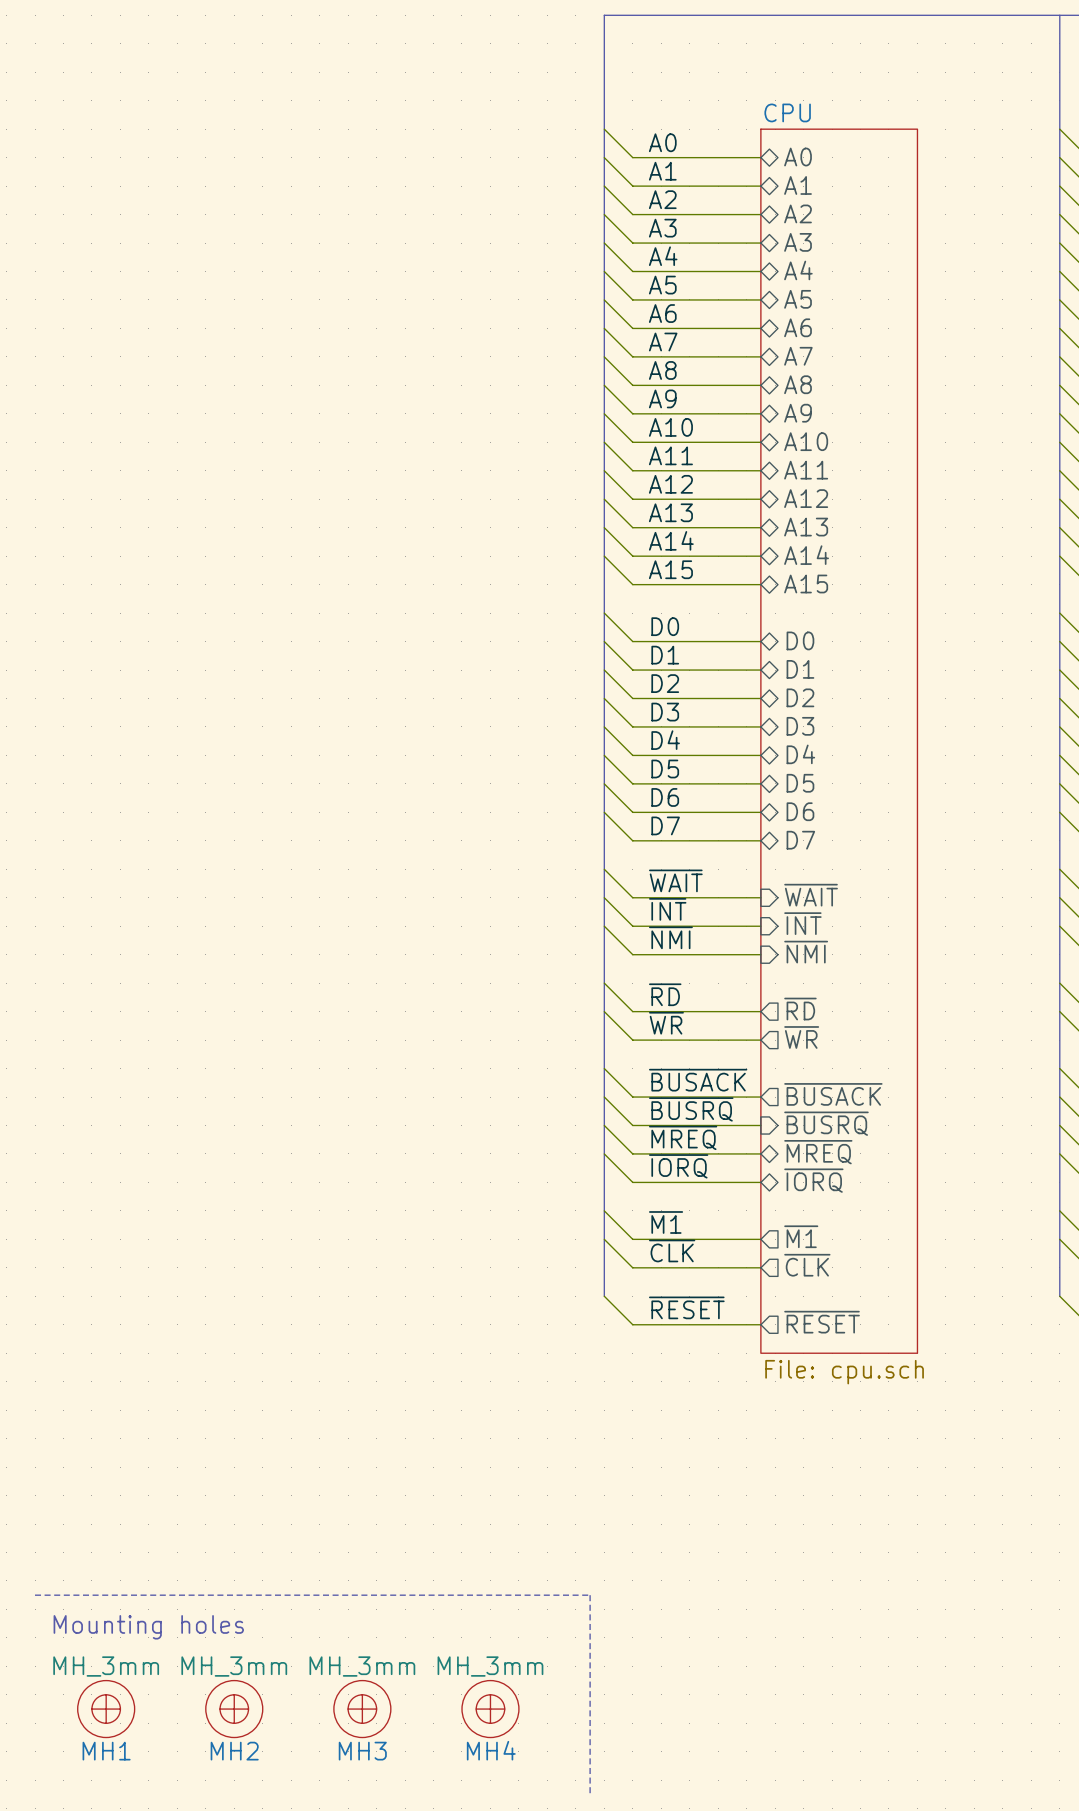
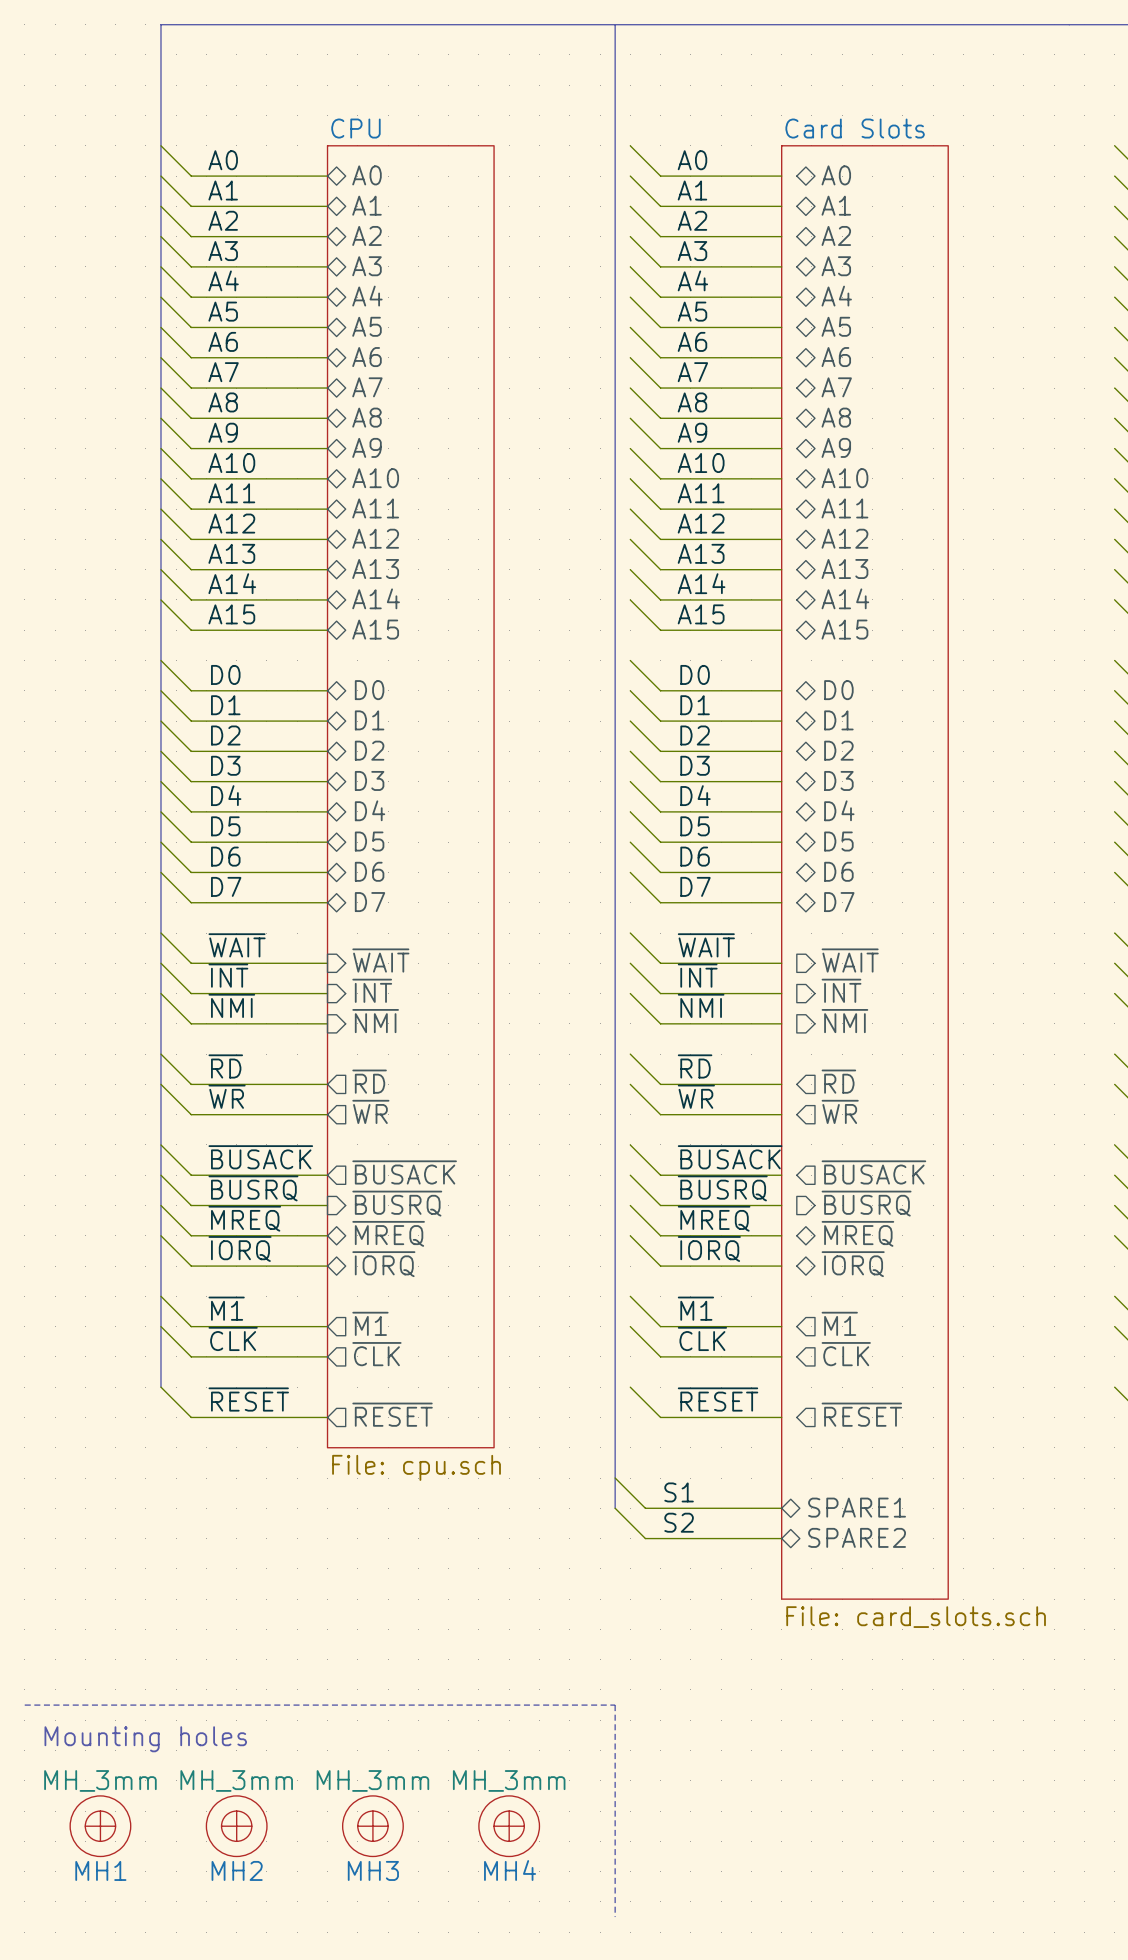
bus: none -> (615, 24) (615, 1508)
bus: (604, 15) (604, 1296) -> (630, 24) (160, 24) (160, 1387)
bus: (1059, 15) (1059, 1296) -> none
wire: none -> (160, 145) (191, 176) (327, 176)
label: none -> A0 (223, 160)
wire: none -> (160, 176) (191, 206) (327, 206)
sheet pin: none -> A0 (366, 175)
wire: (746, 157) (760, 157) -> none
label: none -> A1 (223, 190)
sheet pin: none -> A1 (366, 205)
wire: none -> (160, 206) (191, 236) (327, 236)
wire: (746, 186) (760, 186) -> none
label: none -> A2 (223, 220)
sheet pin: none -> A2 (366, 235)
wire: none -> (160, 236) (191, 266) (327, 266)
wire: (746, 214) (760, 214) -> none
label: none -> A3 (223, 251)
sheet pin: none -> A3 (366, 266)
wire: none -> (160, 266) (191, 297) (327, 297)
wire: (746, 243) (760, 243) -> none
label: none -> A4 (223, 280)
sheet pin: none -> A4 (367, 296)
wire: none -> (160, 297) (191, 327) (327, 327)
wire: (746, 271) (760, 271) -> none
label: none -> A5 (223, 311)
wire: none -> (160, 327) (191, 357) (327, 357)
sheet pin: none -> A5 (366, 326)
wire: (746, 299) (760, 299) -> none
label: none -> A6 (223, 341)
sheet pin: none -> A6 (366, 357)
wire: none -> (160, 357) (191, 388) (327, 388)
wire: (746, 328) (760, 328) -> none
label: none -> A7 (223, 372)
wire: none -> (160, 388) (191, 418) (327, 418)
sheet pin: none -> A7 (367, 387)
wire: (746, 356) (760, 356) -> none
label: none -> A8 (223, 402)
sheet pin: none -> A8 (366, 417)
wire: none -> (160, 418) (191, 448) (327, 448)
wire: (746, 385) (760, 385) -> none
label: none -> A9 (223, 432)
wire: none -> (160, 448) (191, 478) (327, 478)
sheet pin: none -> A9 (366, 447)
wire: (746, 413) (760, 413) -> none
label: none -> A10 (231, 463)
sheet pin: none -> A10 (375, 478)
wire: none -> (160, 478) (191, 509) (327, 509)
wire: (746, 442) (760, 442) -> none
label: none -> A11 (231, 493)
wire: none -> (160, 509) (191, 539) (327, 539)
sheet pin: none -> A11 (375, 508)
wire: (746, 470) (760, 470) -> none
label: none -> A12 (231, 523)
sheet pin: none -> A12 (375, 538)
wire: none -> (160, 539) (191, 569) (327, 569)
wire: (746, 499) (760, 499) -> none
label: none -> A13 (231, 553)
wire: none -> (160, 569) (191, 599) (327, 599)
sheet pin: none -> A13 (375, 569)
wire: (746, 527) (760, 527) -> none
label: none -> A14 (232, 583)
sheet pin: none -> A14 (376, 598)
wire: none -> (160, 599) (191, 630) (327, 630)
wire: (746, 556) (760, 556) -> none
label: none -> A15 (231, 614)
sheet pin: none -> A15 (375, 629)
wire: (746, 584) (760, 584) -> none
wire: none -> (160, 660) (191, 690) (327, 690)
label: none -> D0 (225, 674)
sheet pin: none -> D0 (369, 690)
wire: none -> (160, 690) (191, 721) (327, 721)
wire: (746, 641) (760, 641) -> none
label: none -> D1 (225, 705)
sheet pin: none -> D1 (369, 720)
wire: none -> (160, 721) (191, 751) (327, 751)
wire: (746, 670) (760, 670) -> none
label: none -> D2 (225, 735)
sheet pin: none -> D2 (369, 750)
wire: none -> (160, 751) (191, 781) (327, 781)
wire: (746, 698) (760, 698) -> none
label: none -> D3 (225, 765)
wire: none -> (160, 781) (191, 811) (327, 811)
sheet pin: none -> D3 (369, 780)
wire: (746, 726) (760, 726) -> none
label: none -> D4 (226, 795)
sheet CPU: none -> File: cpu.sch (410, 796)
sheet CPU: File: cpu.sch (839, 741) -> none
sheet pin: none -> D4 (370, 810)
wire: none -> (160, 811) (191, 842) (327, 842)
wire: (746, 755) (760, 755) -> none
label: none -> D5 (225, 826)
wire: none -> (160, 842) (191, 872) (327, 872)
sheet pin: none -> D5 (369, 841)
wire: (746, 783) (760, 783) -> none
label: none -> D6 (225, 856)
sheet pin: none -> D6 (369, 871)
wire: none -> (160, 872) (191, 902) (327, 902)
wire: (746, 812) (760, 812) -> none
sheet Card Slots: none -> File: card_slots.sch (864, 872)
label: none -> D7 (226, 886)
sheet pin: none -> D7 (370, 902)
wire: (746, 840) (760, 840) -> none
wire: none -> (160, 933) (191, 963) (327, 963)
label: none -> ~{WAIT} (237, 945)
sheet pin: none -> ~{WAIT} (380, 960)
wire: none -> (160, 963) (191, 993) (327, 993)
wire: (746, 897) (760, 897) -> none
label: none -> ~{INT} (228, 975)
sheet pin: none -> ~{INT} (372, 990)
wire: none -> (160, 993) (191, 1023) (327, 1023)
wire: (746, 926) (760, 926) -> none
label: none -> ~{NMI} (231, 1005)
sheet pin: none -> ~{NMI} (375, 1021)
wire: (746, 954) (760, 954) -> none
wire: none -> (160, 1054) (191, 1084) (327, 1084)
label: none -> ~{RD} (225, 1066)
sheet pin: none -> ~{RD} (369, 1081)
wire: none -> (160, 1084) (191, 1114) (327, 1114)
wire: (746, 1011) (760, 1011) -> none
label: none -> ~{WR} (227, 1096)
sheet pin: none -> ~{WR} (370, 1111)
wire: (746, 1040) (760, 1040) -> none
wire: none -> (160, 1144) (191, 1175) (327, 1175)
label: none -> ~{BUSACK} (260, 1157)
sheet pin: none -> ~{BUSACK} (404, 1172)
wire: none -> (160, 1175) (191, 1205) (327, 1205)
wire: (746, 1097) (760, 1097) -> none
label: none -> ~{BUSRQ} (253, 1188)
sheet pin: none -> ~{BUSRQ} (397, 1203)
wire: none -> (160, 1205) (191, 1235) (327, 1235)
wire: (746, 1125) (760, 1125) -> none
label: none -> ~{MREQ} (244, 1218)
sheet pin: none -> ~{MREQ} (388, 1233)
wire: none -> (160, 1235) (191, 1266) (327, 1266)
wire: (746, 1153) (760, 1153) -> none
label: none -> ~{IORQ} (240, 1248)
sheet pin: none -> ~{IORQ} (383, 1264)
wire: (746, 1182) (760, 1182) -> none
wire: none -> (160, 1296) (191, 1326) (327, 1326)
label: none -> ~{M1} (226, 1308)
sheet pin: none -> ~{M1} (370, 1323)
wire: none -> (160, 1326) (191, 1356) (327, 1356)
wire: (746, 1239) (760, 1239) -> none
label: none -> ~{CLK} (233, 1338)
sheet pin: none -> ~{CLK} (376, 1354)
wire: (746, 1267) (760, 1267) -> none
wire: none -> (160, 1387) (191, 1417) (327, 1417)
label: none -> ~{RESET} (248, 1399)
sheet pin: none -> ~{RESET} (392, 1414)
wire: (746, 1324) (760, 1324) -> none
wire: none -> (615, 1478) (645, 1508) (781, 1508)
label: none -> S1 (679, 1492)
sheet pin: none -> SPARE1 (857, 1507)
wire: none -> (615, 1508) (645, 1538) (781, 1538)
label: none -> S2 (679, 1522)
sheet pin: none -> SPARE2 (857, 1537)

